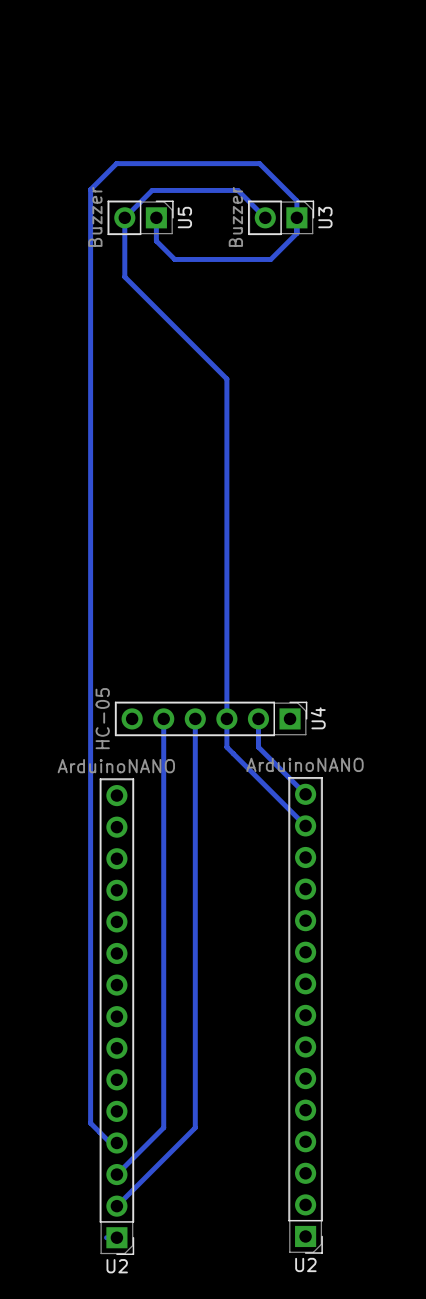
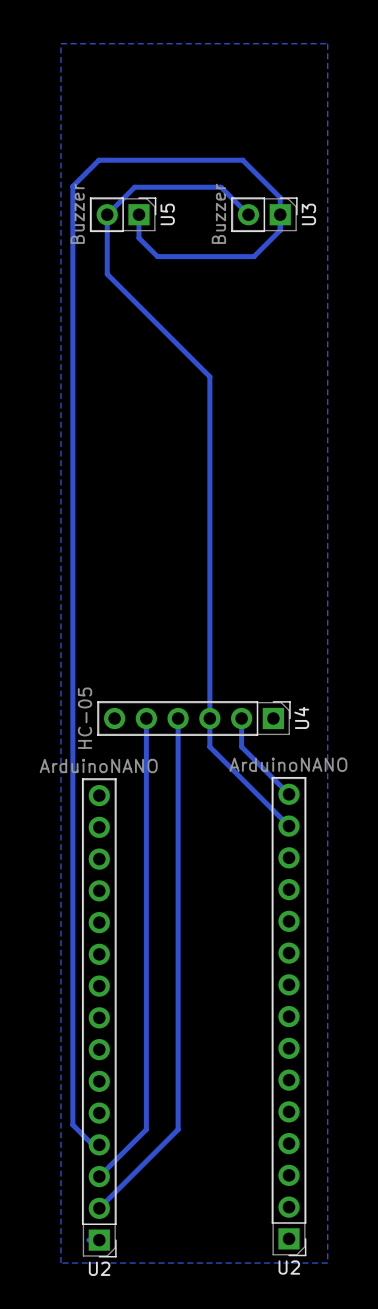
bottom zone outline: none -> (60, 43) (60, 1263) (327, 1263) (327, 43) (60, 43)

